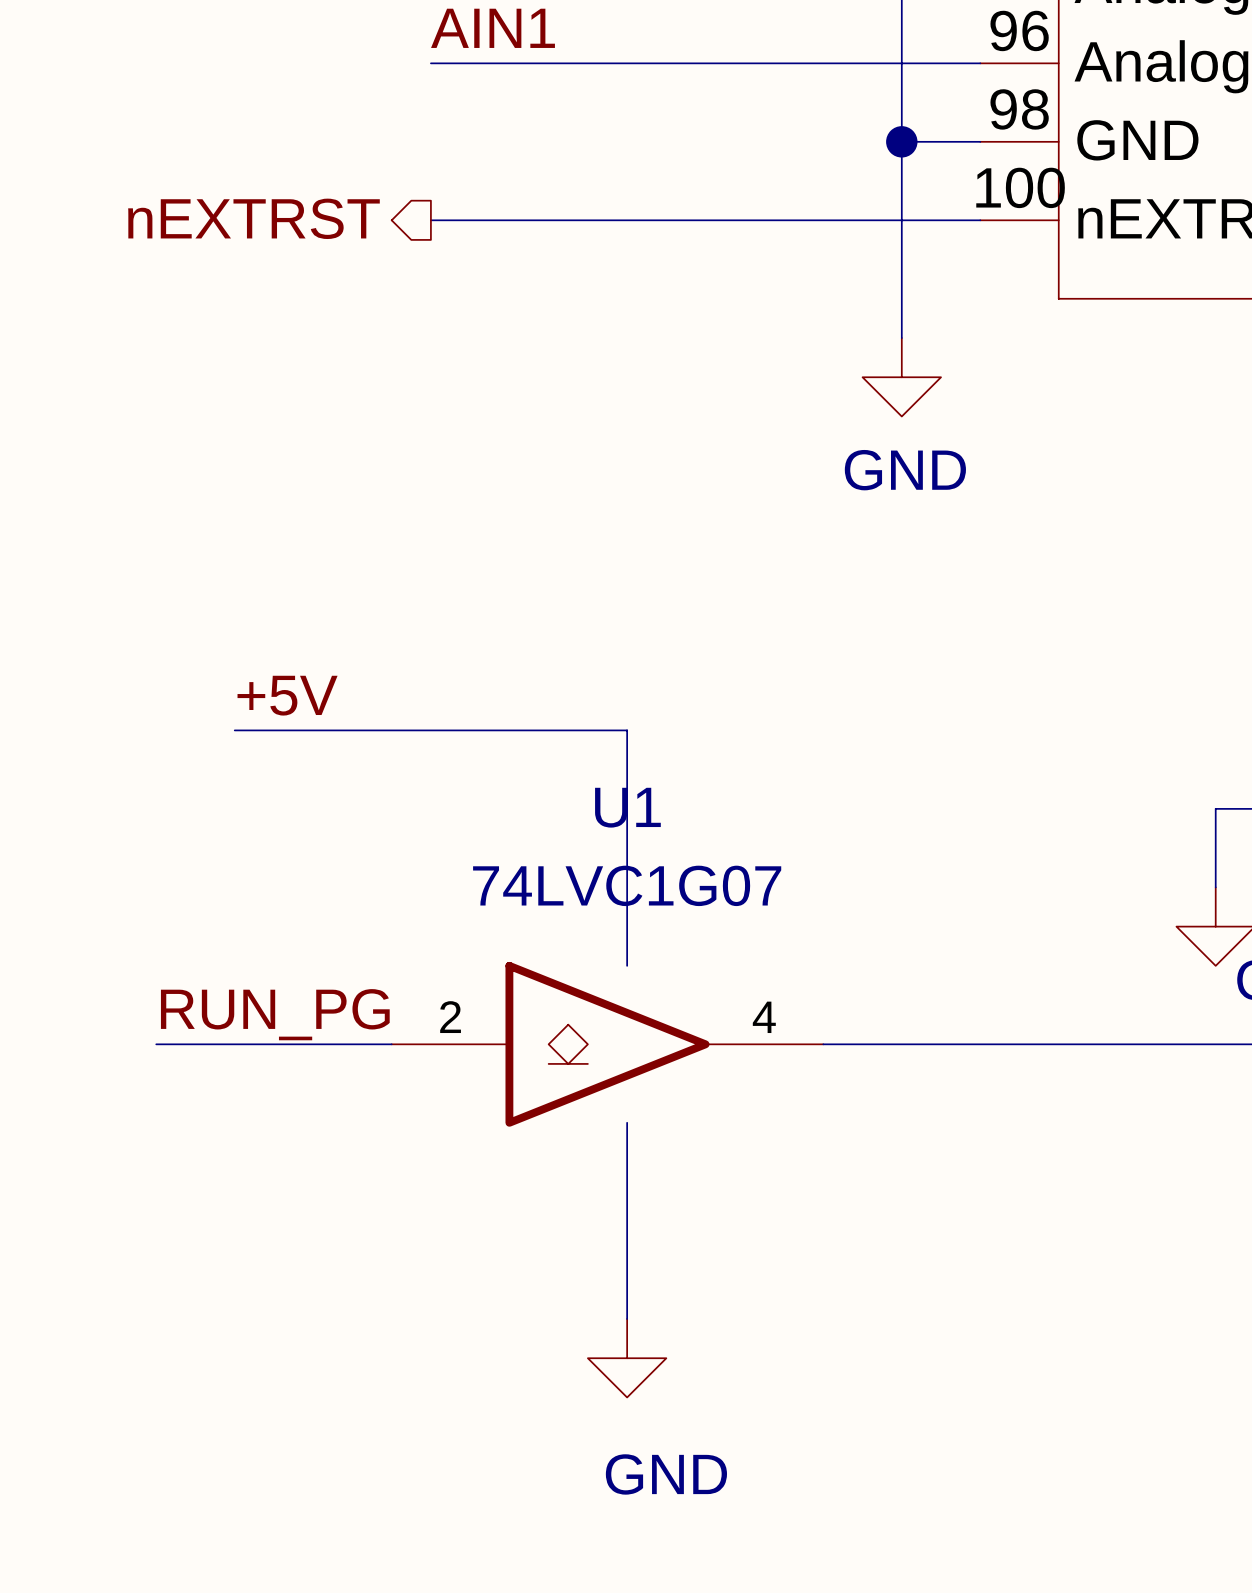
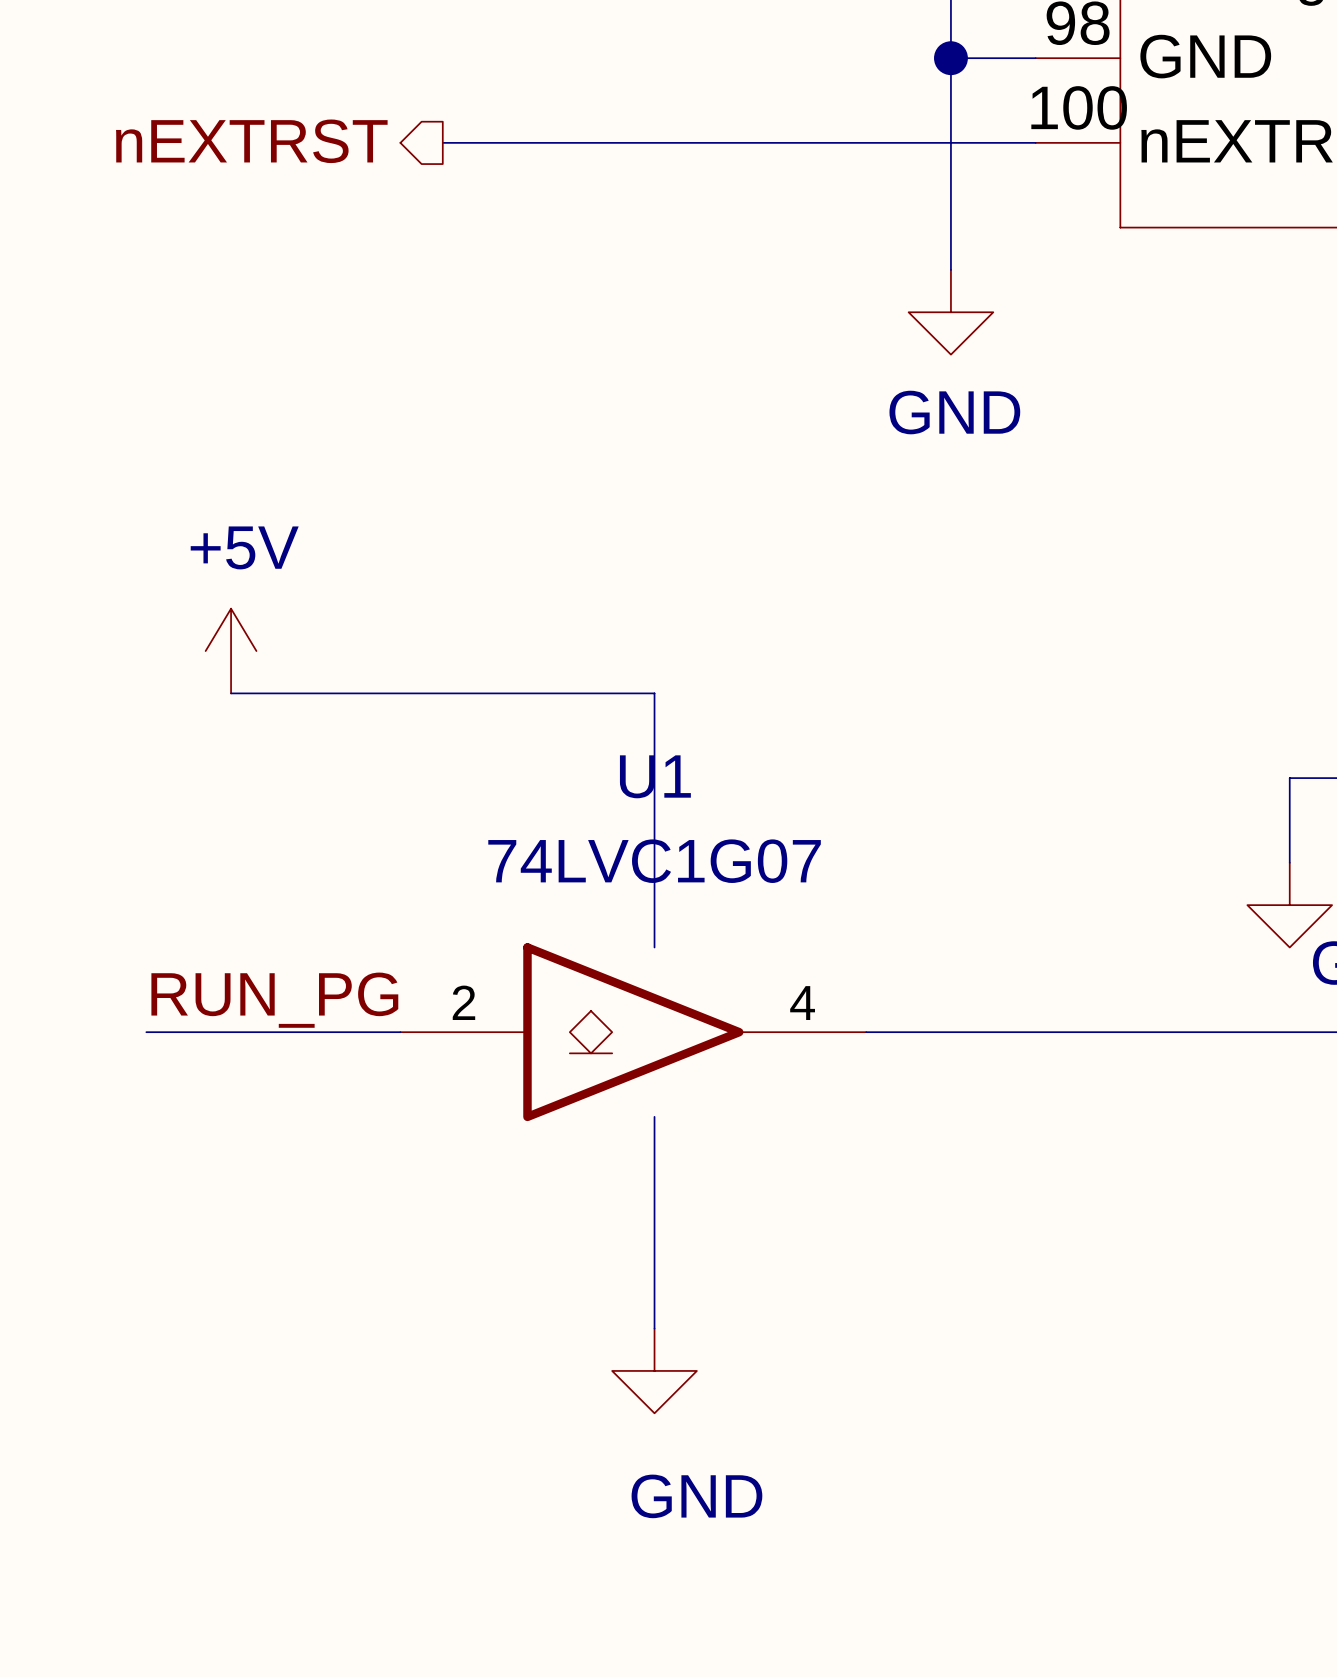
power symbol: none -> +5V (231, 651)
label: +5V (287, 695) -> none

